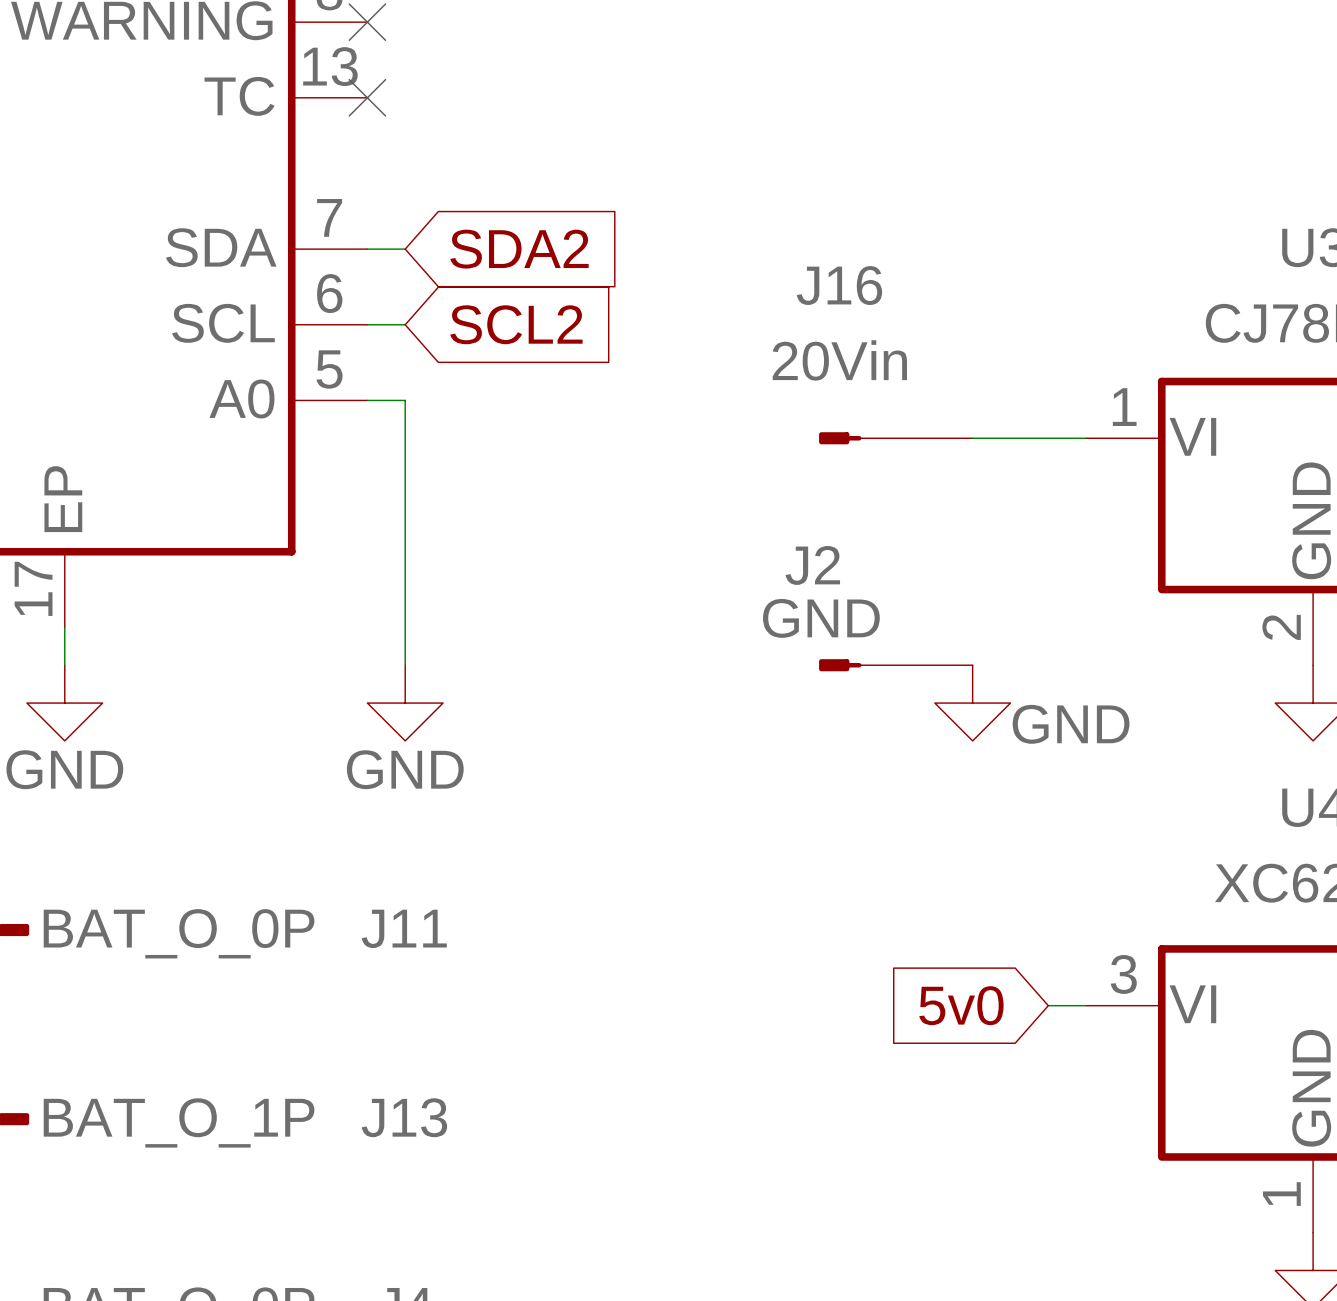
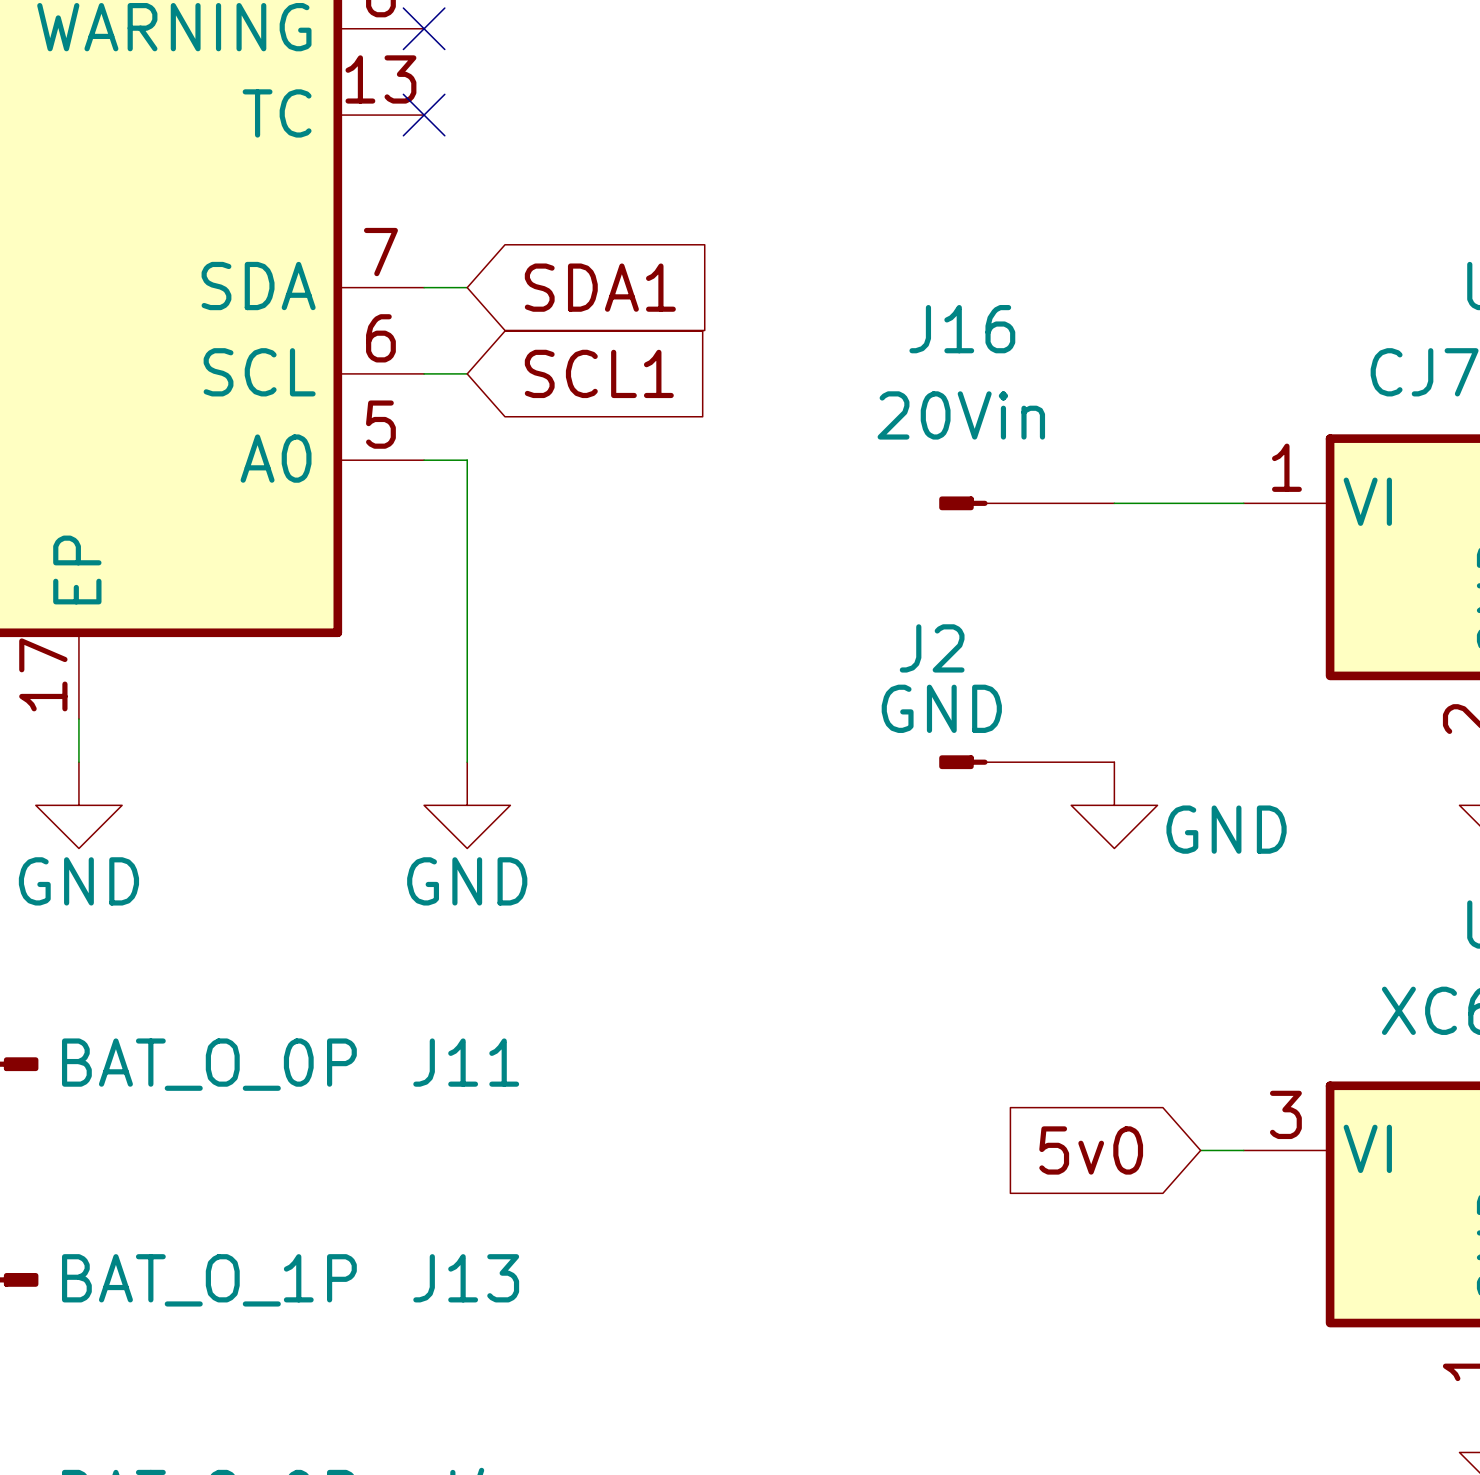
global label: SDA2 (519, 249) -> SDA1 (600, 287)
global label: SCL2 (516, 324) -> SCL1 (599, 373)

